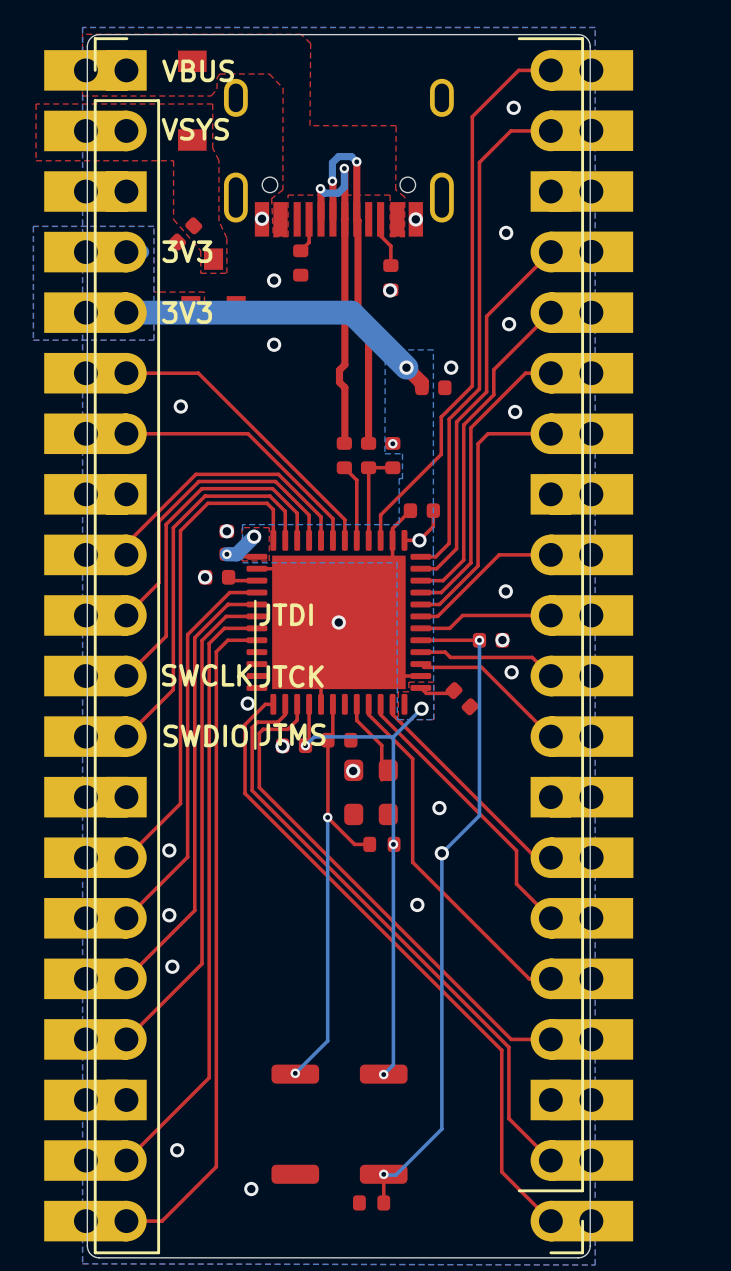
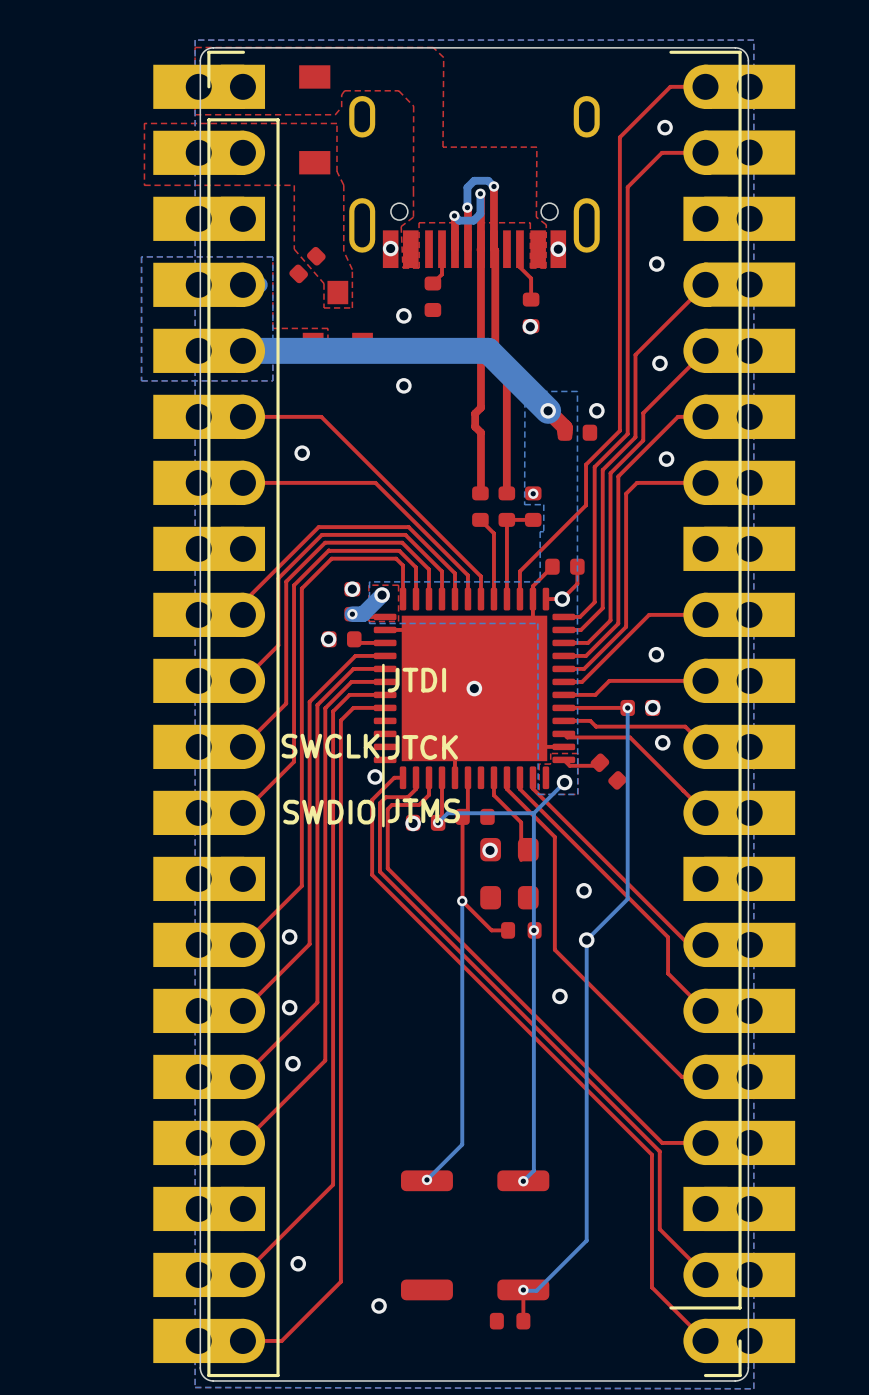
text: VBUS (198, 70) -> none
text: VSYS (195, 129) -> none
text: 3V3 (187, 251) -> none
text: 3V3 (187, 312) -> none

